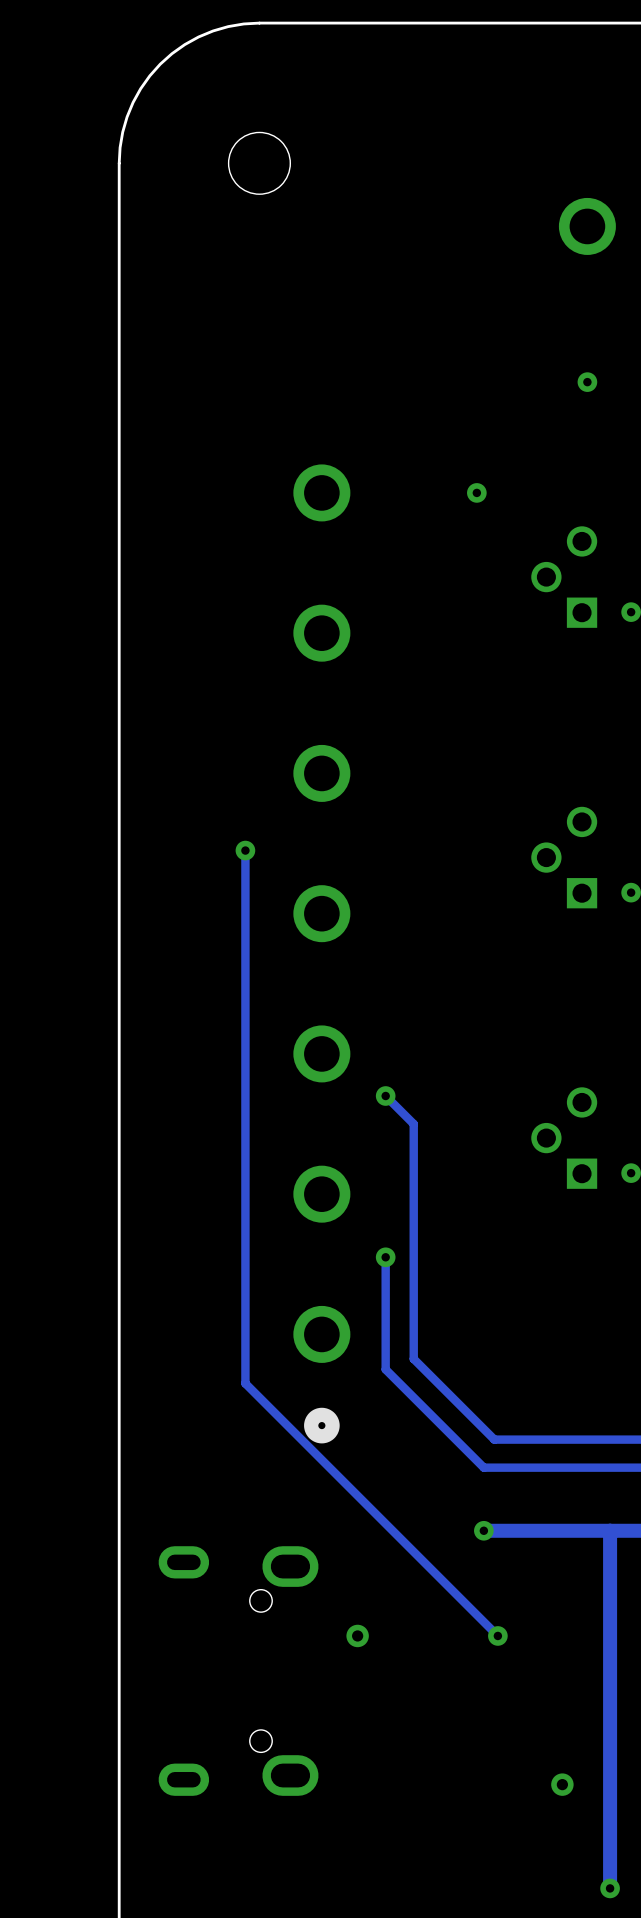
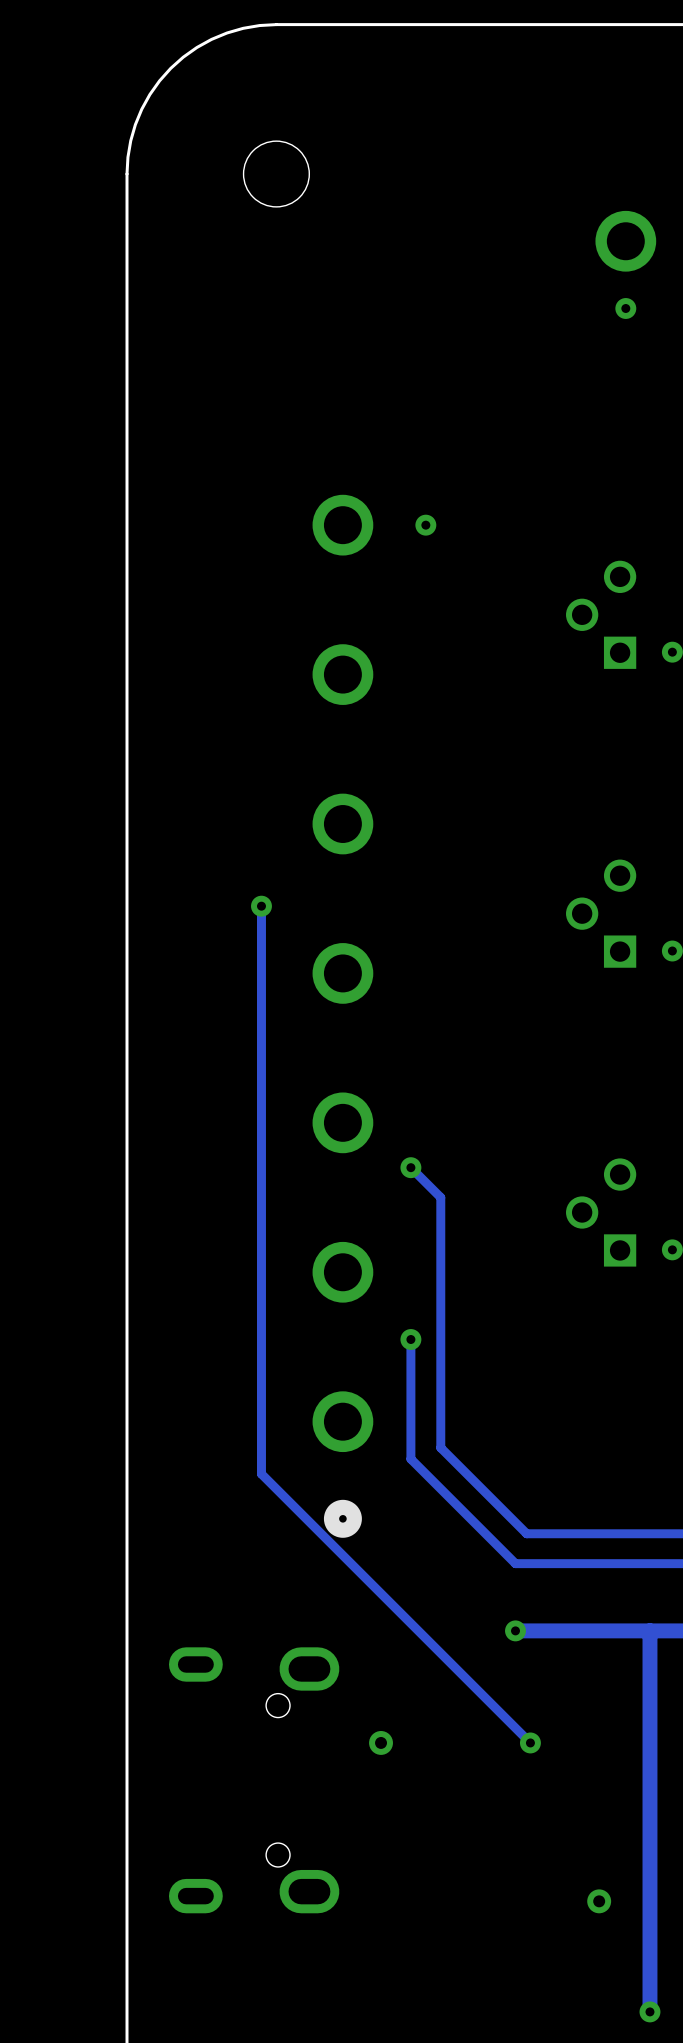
via position: (587, 382) -> (625, 308)
via position: (476, 492) -> (425, 525)

